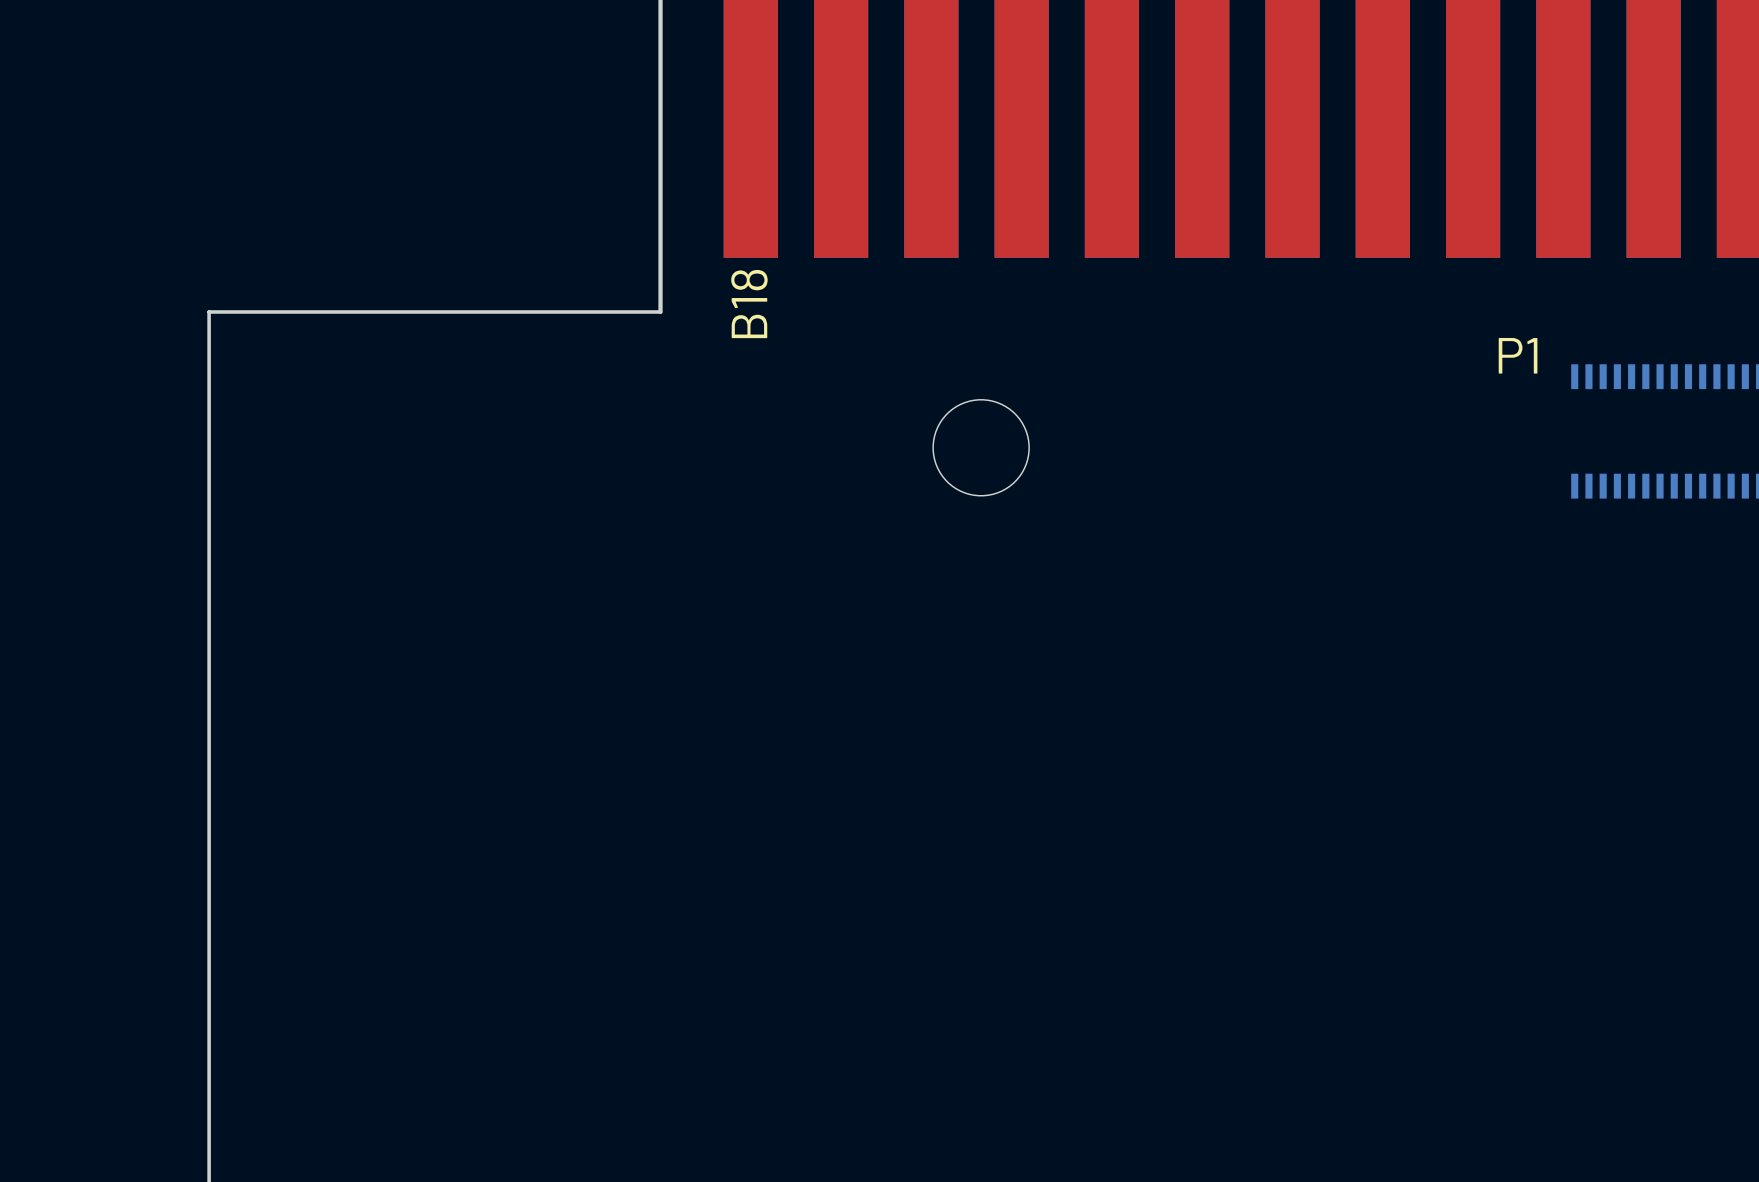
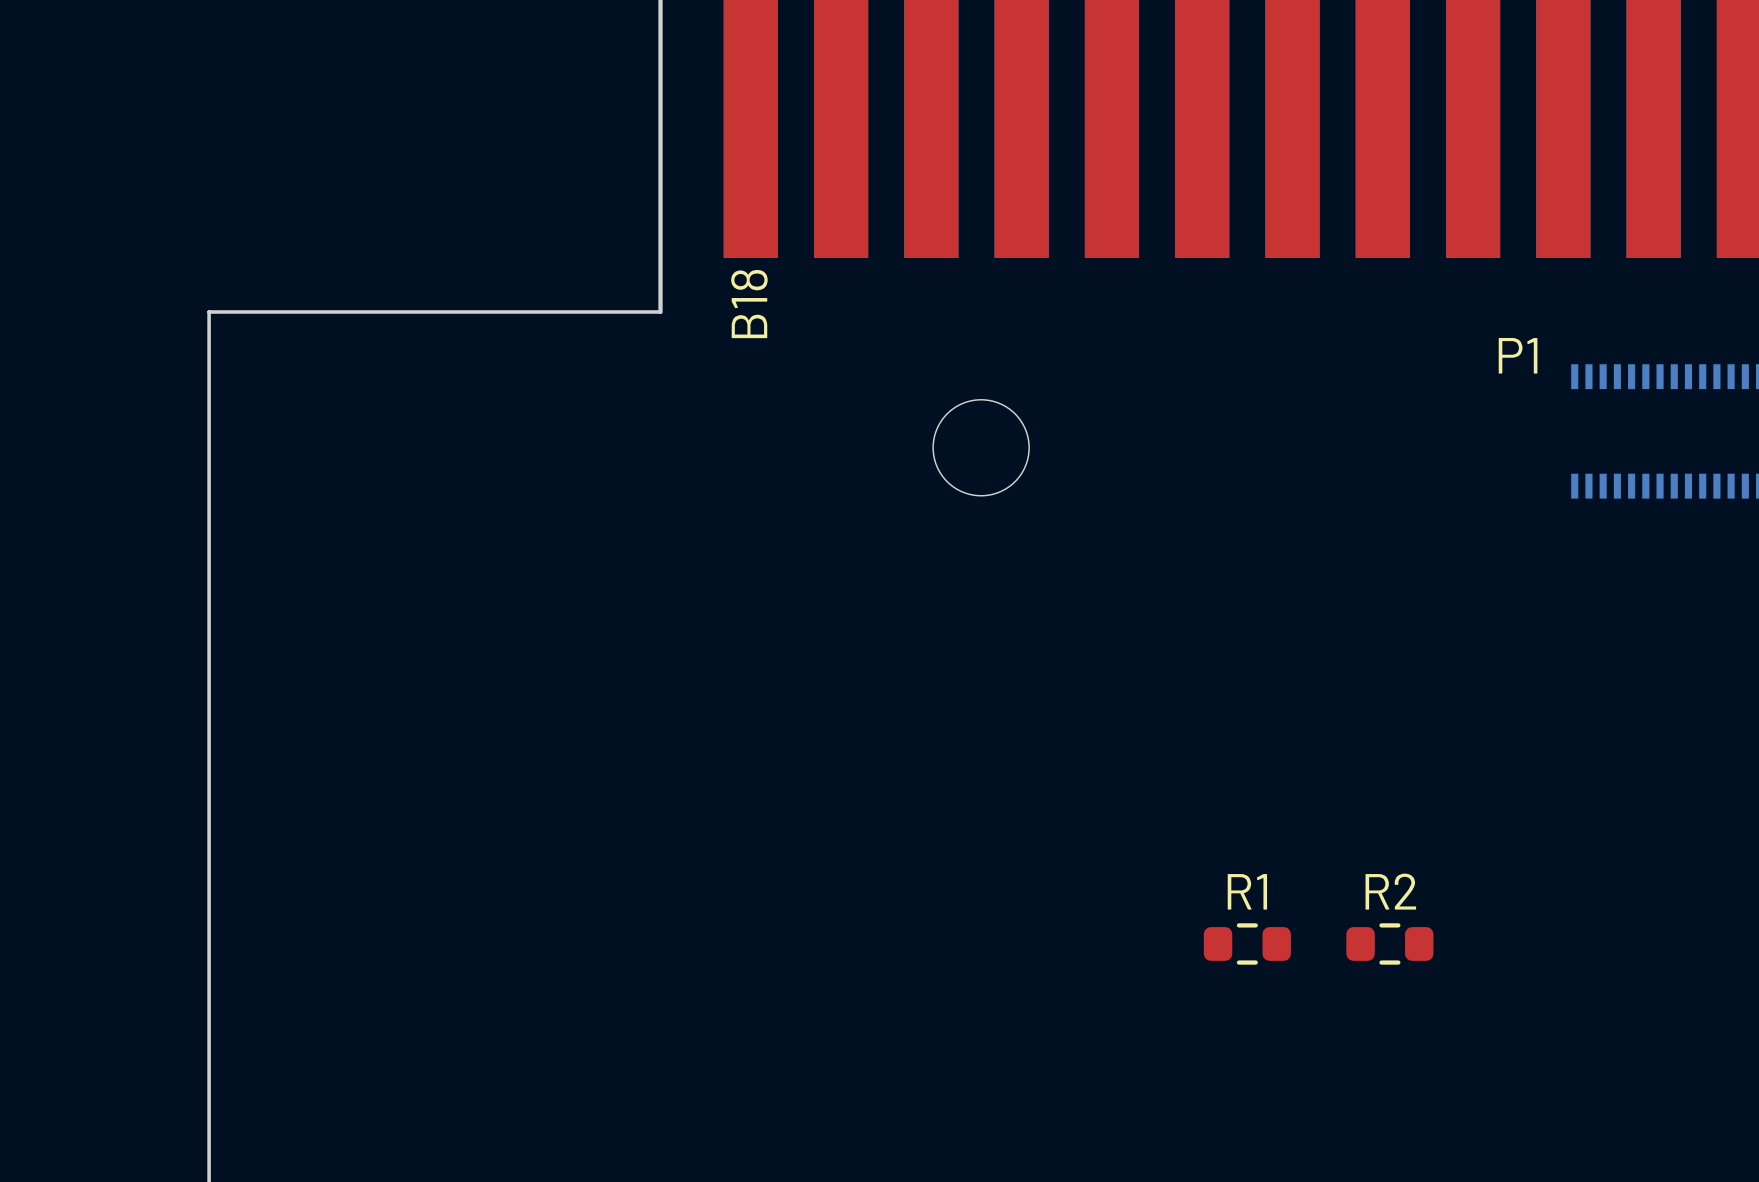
R1: none -> (1247, 943)
R2: none -> (1389, 943)

